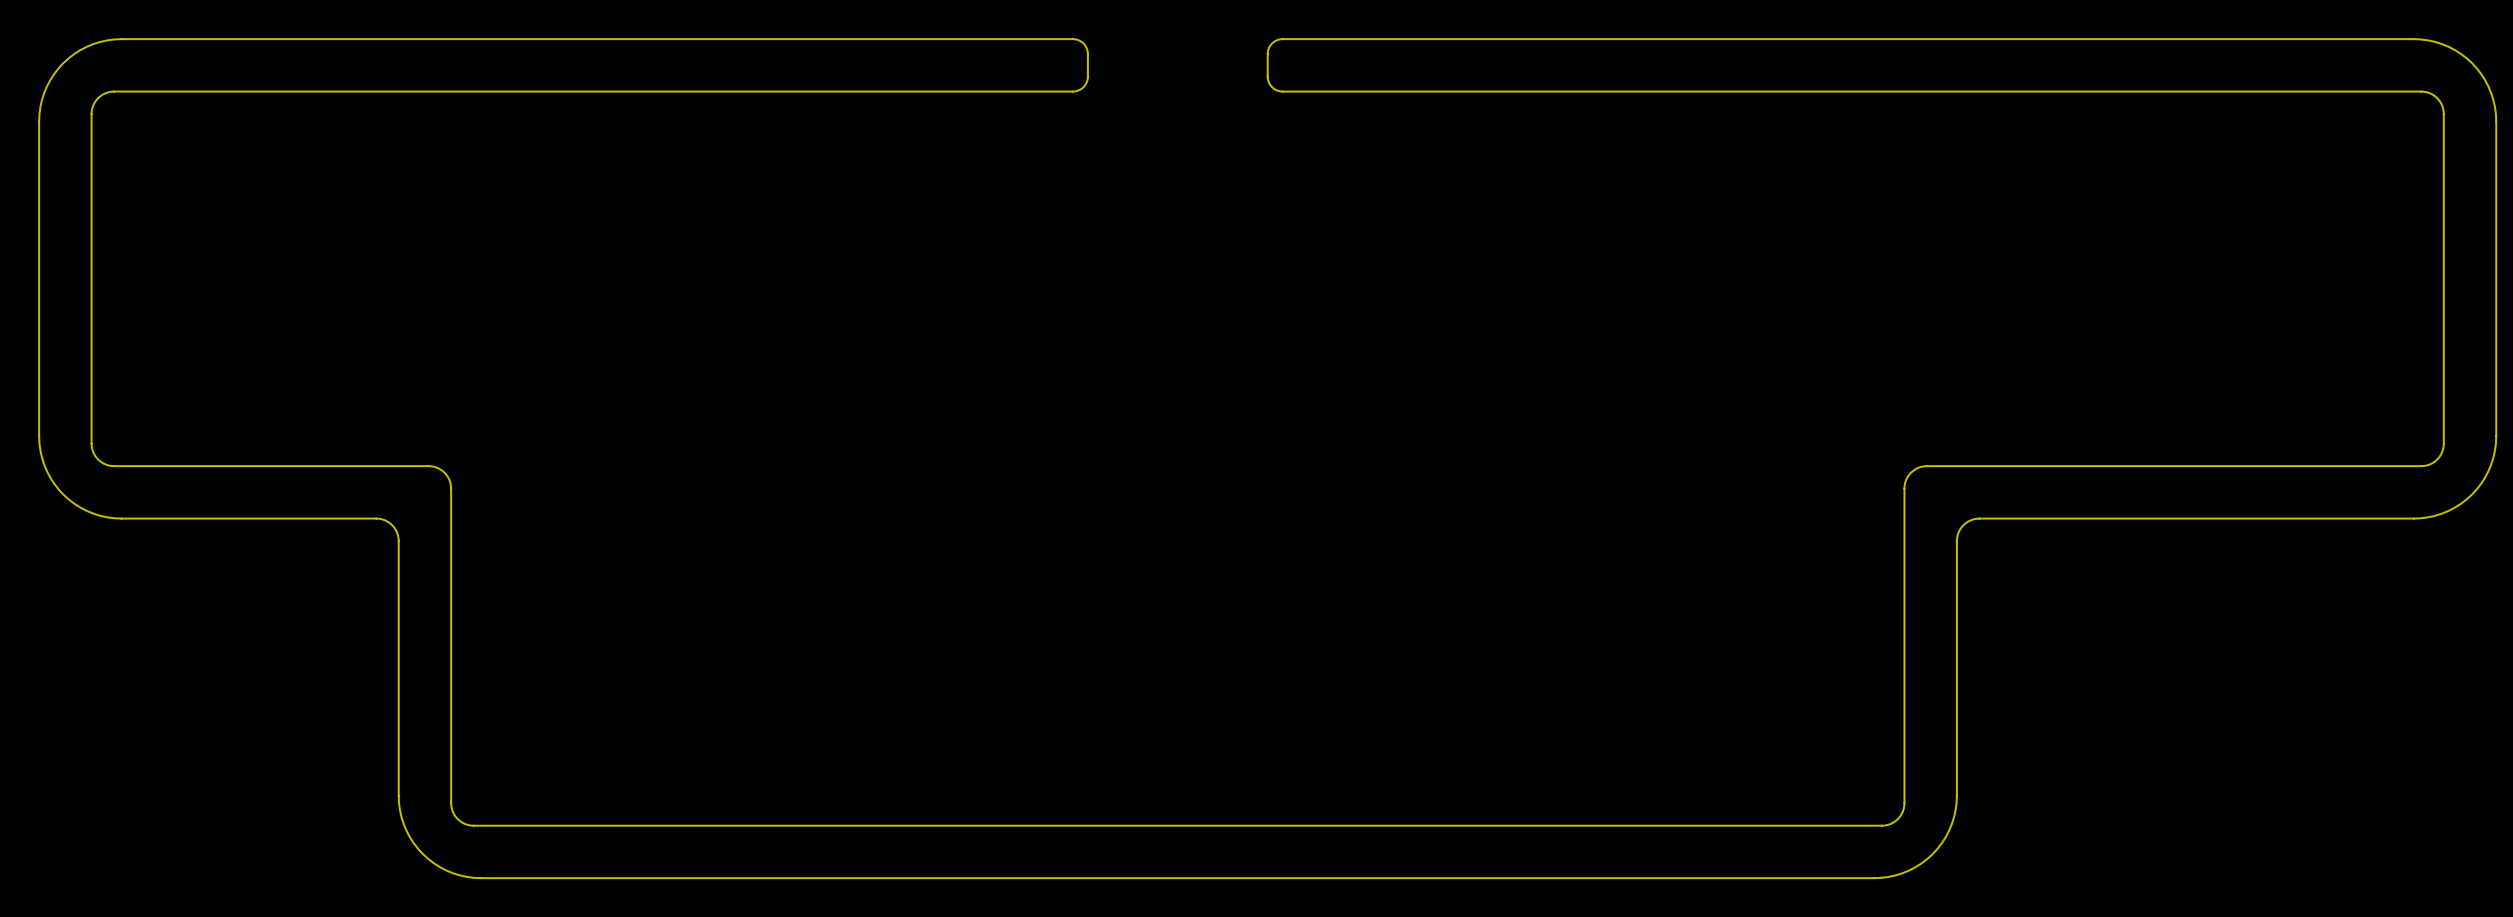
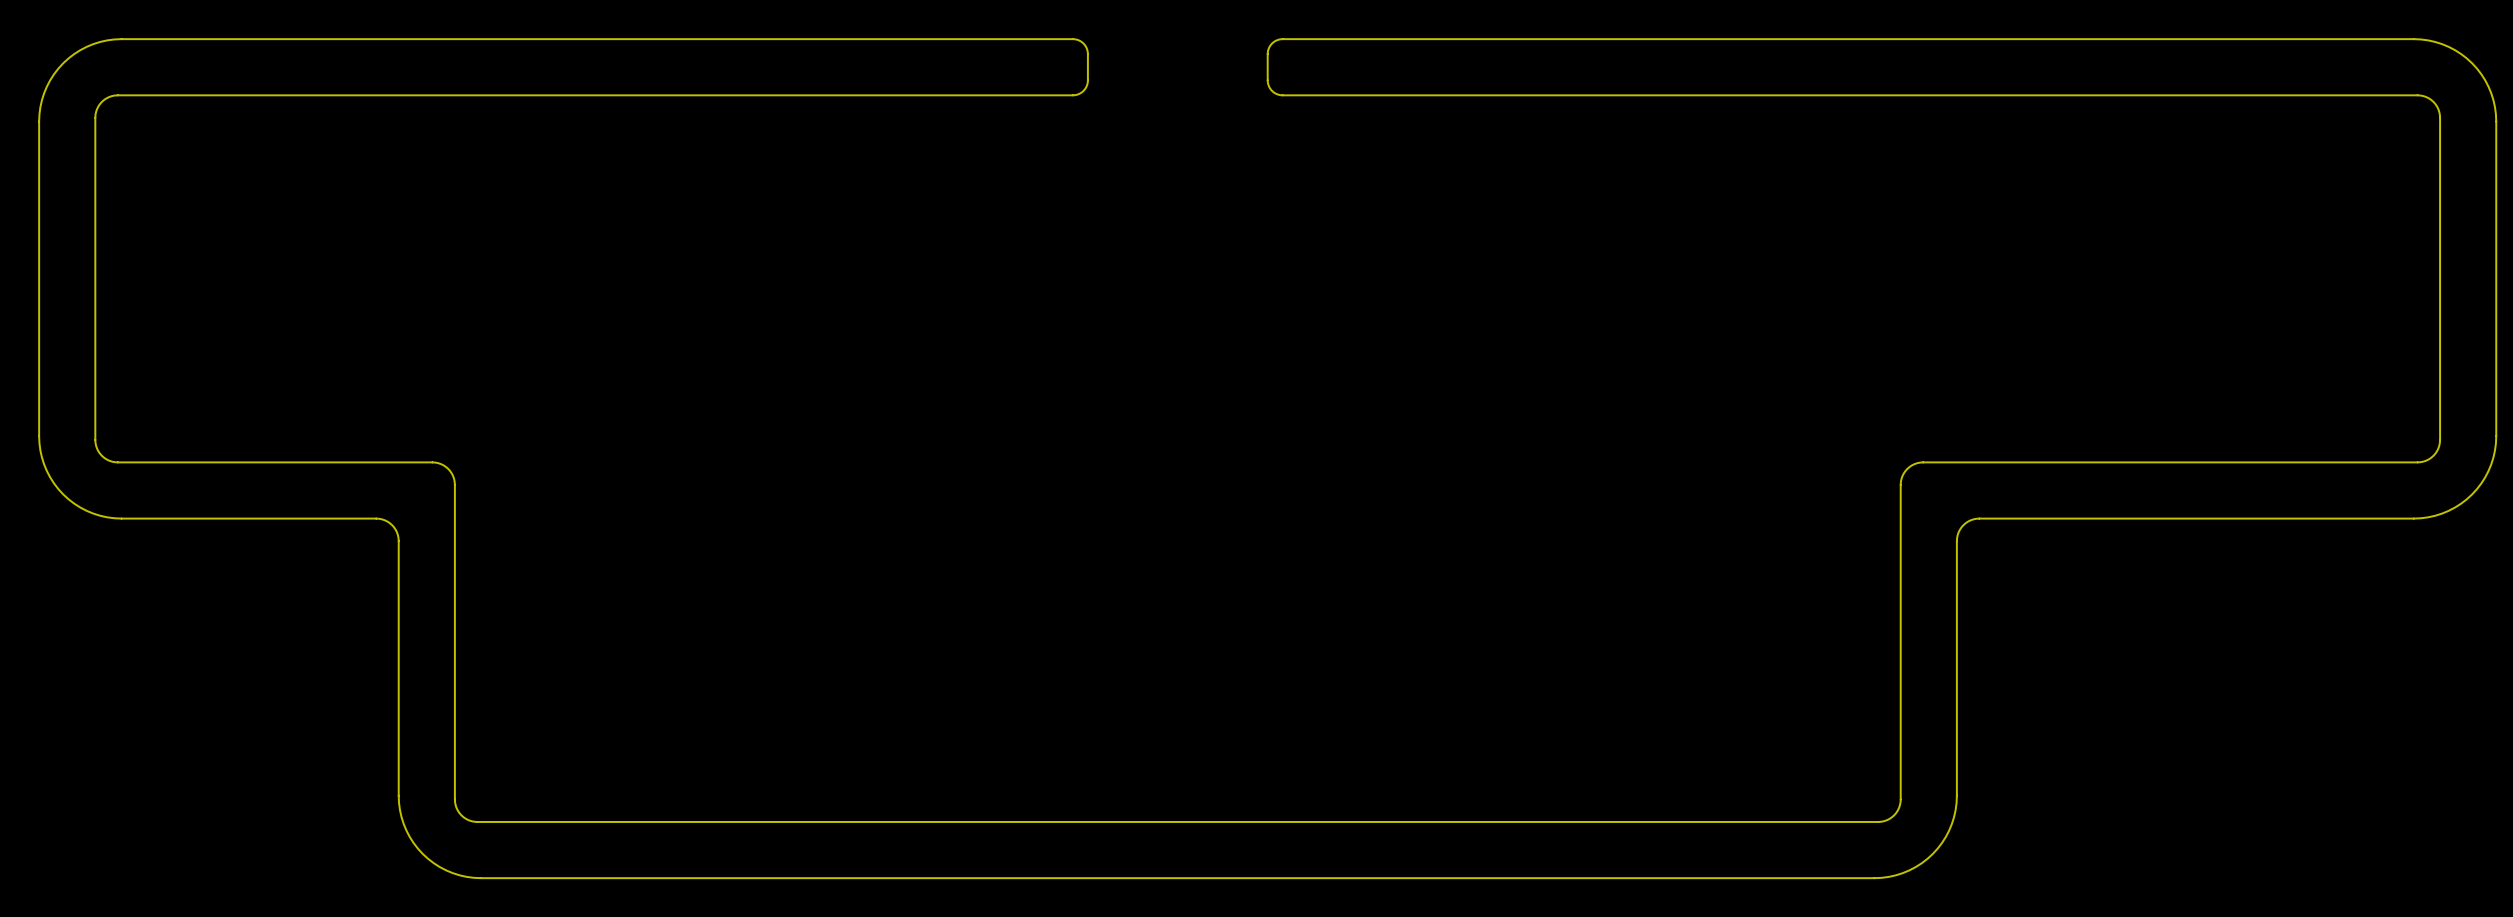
board edge: (1087, 76) (1083, 87) (1072, 91) (114, 91) (105, 93) (94, 102) (91, 114) (91, 443) (93, 452) (100, 461) (114, 466) (428, 466) (437, 467) (444, 472) (449, 480) (451, 488) (451, 806) (454, 814) (459, 821) (473, 825) (1887, 824) (1899, 816) (1904, 803) (1904, 488) -> (1087, 76) (1084, 89) (1078, 94) (1072, 95) (117, 95) (109, 97) (98, 106) (95, 117) (95, 439) (97, 448) (104, 457) (117, 462) (432, 462) (441, 464) (448, 468) (453, 476) (454, 484) (455, 802) (459, 813) (471, 821) (1878, 821) (1886, 820) (1894, 815) (1900, 802) (1900, 484) (1903, 473) (1909, 467) (1923, 462) (2417, 462) (2431, 457) (2439, 445) (2440, 117) (2435, 104) (2423, 96) (1282, 95) (1276, 94) (1270, 89) (1267, 76)
board edge: (1267, 76) (1272, 87) (1282, 91) (2421, 91) (2429, 93) (2439, 100) (2443, 114) (2443, 443) (2442, 452) (2435, 461) (2421, 466) (1926, 466) (1918, 467) (1911, 472) (1906, 480) (1904, 488) -> none

